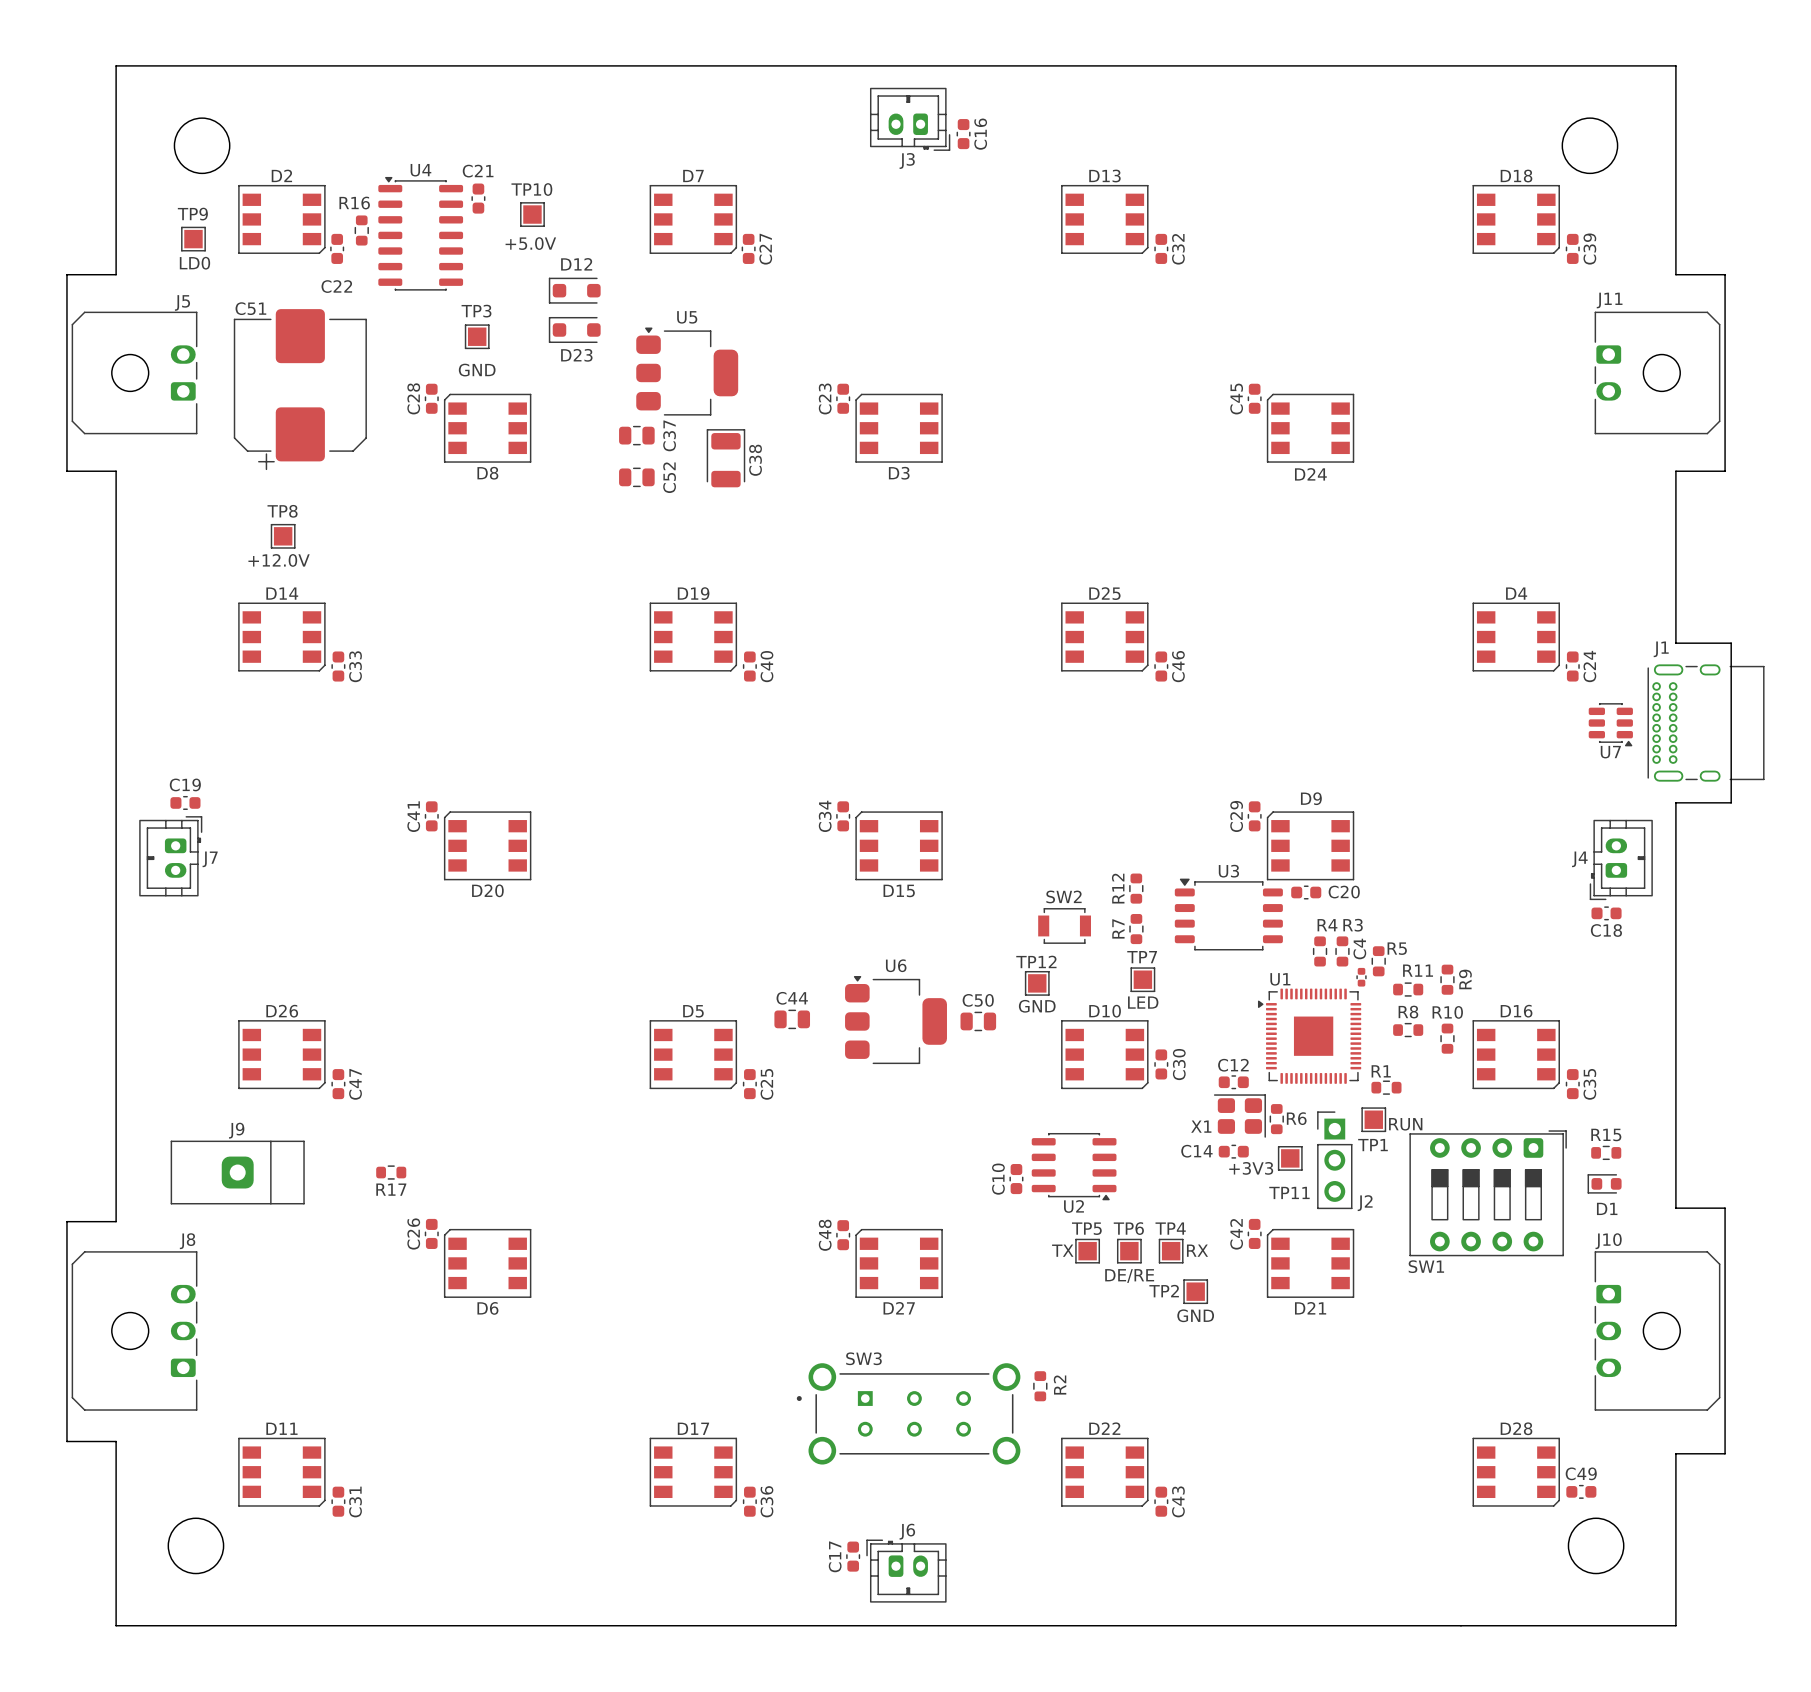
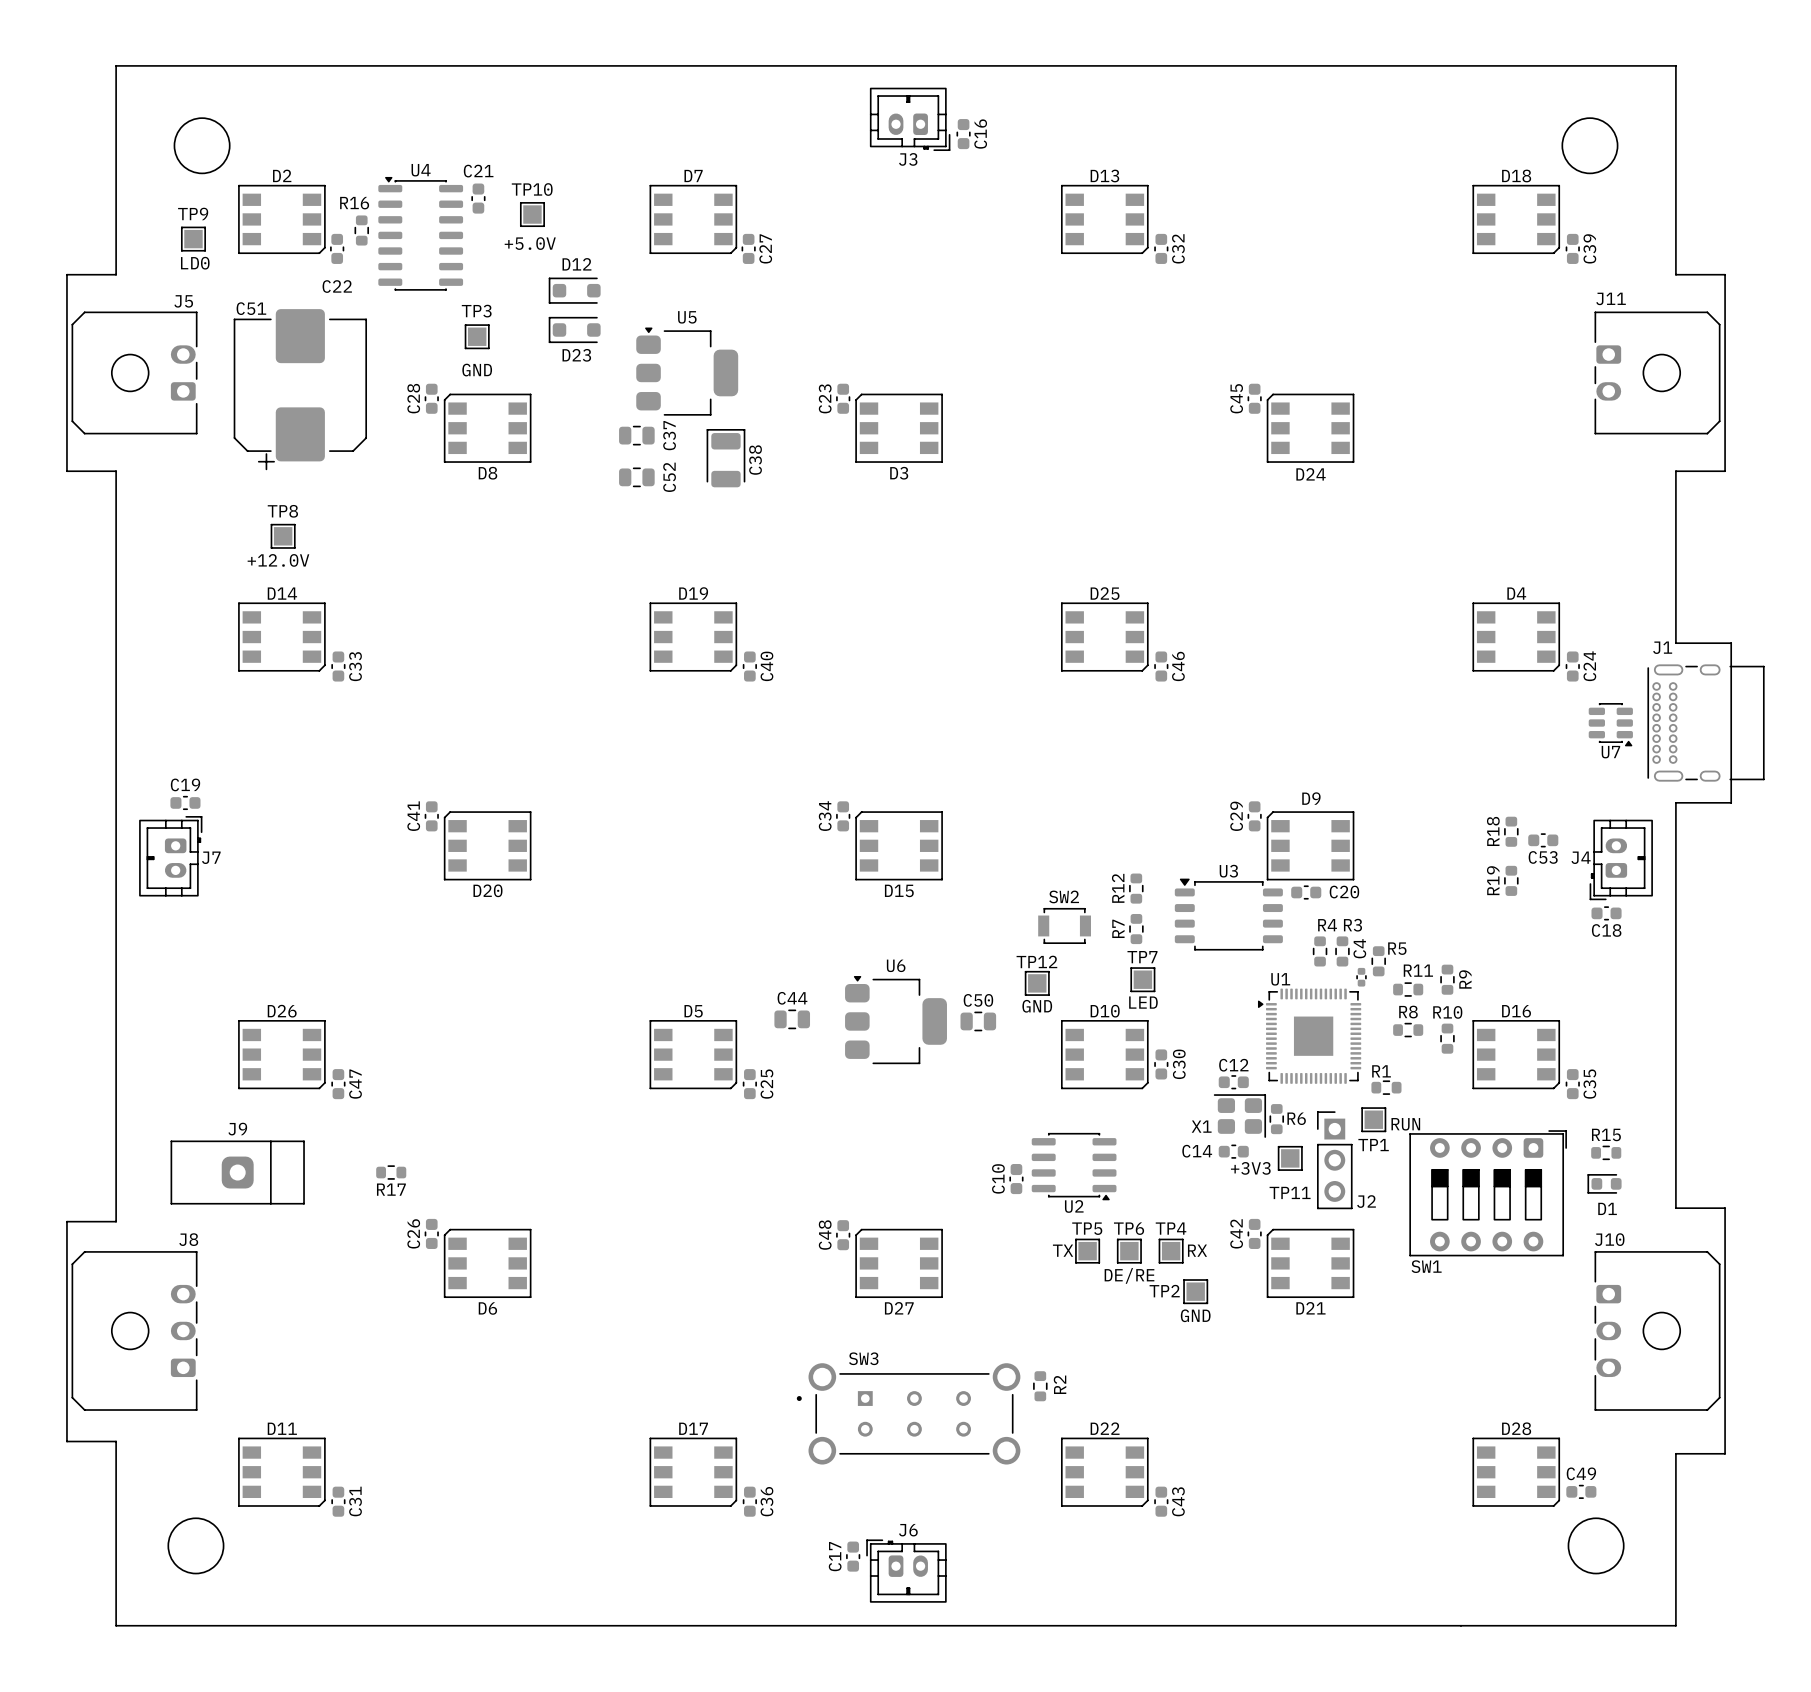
R18: none -> (1511, 831)
C53: none -> (1543, 840)
R19: none -> (1511, 880)

